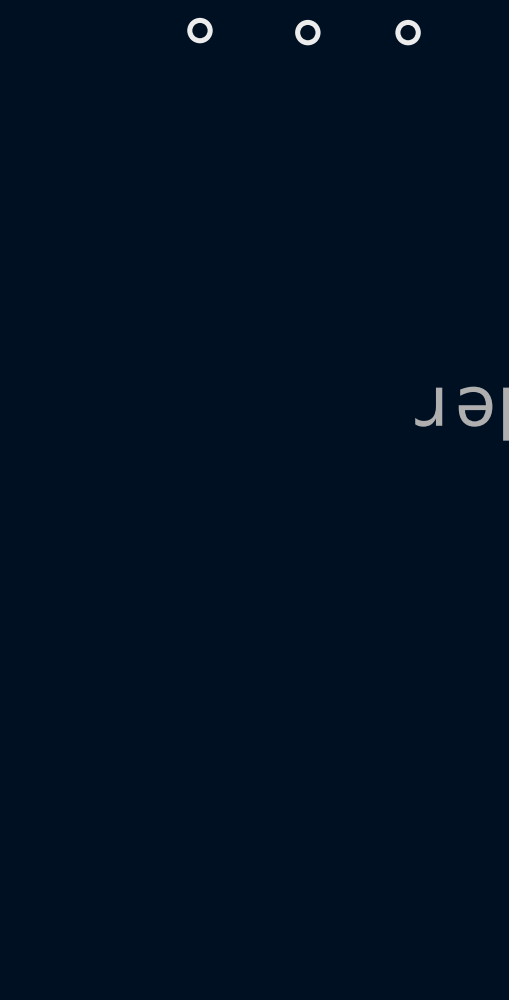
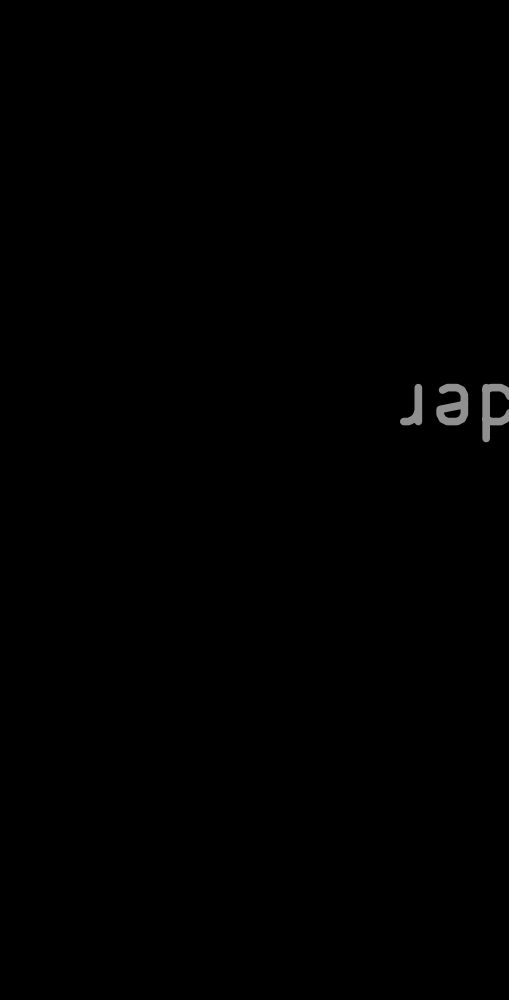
via: (199, 30) -> none
via: (307, 32) -> none
via: (408, 32) -> none

